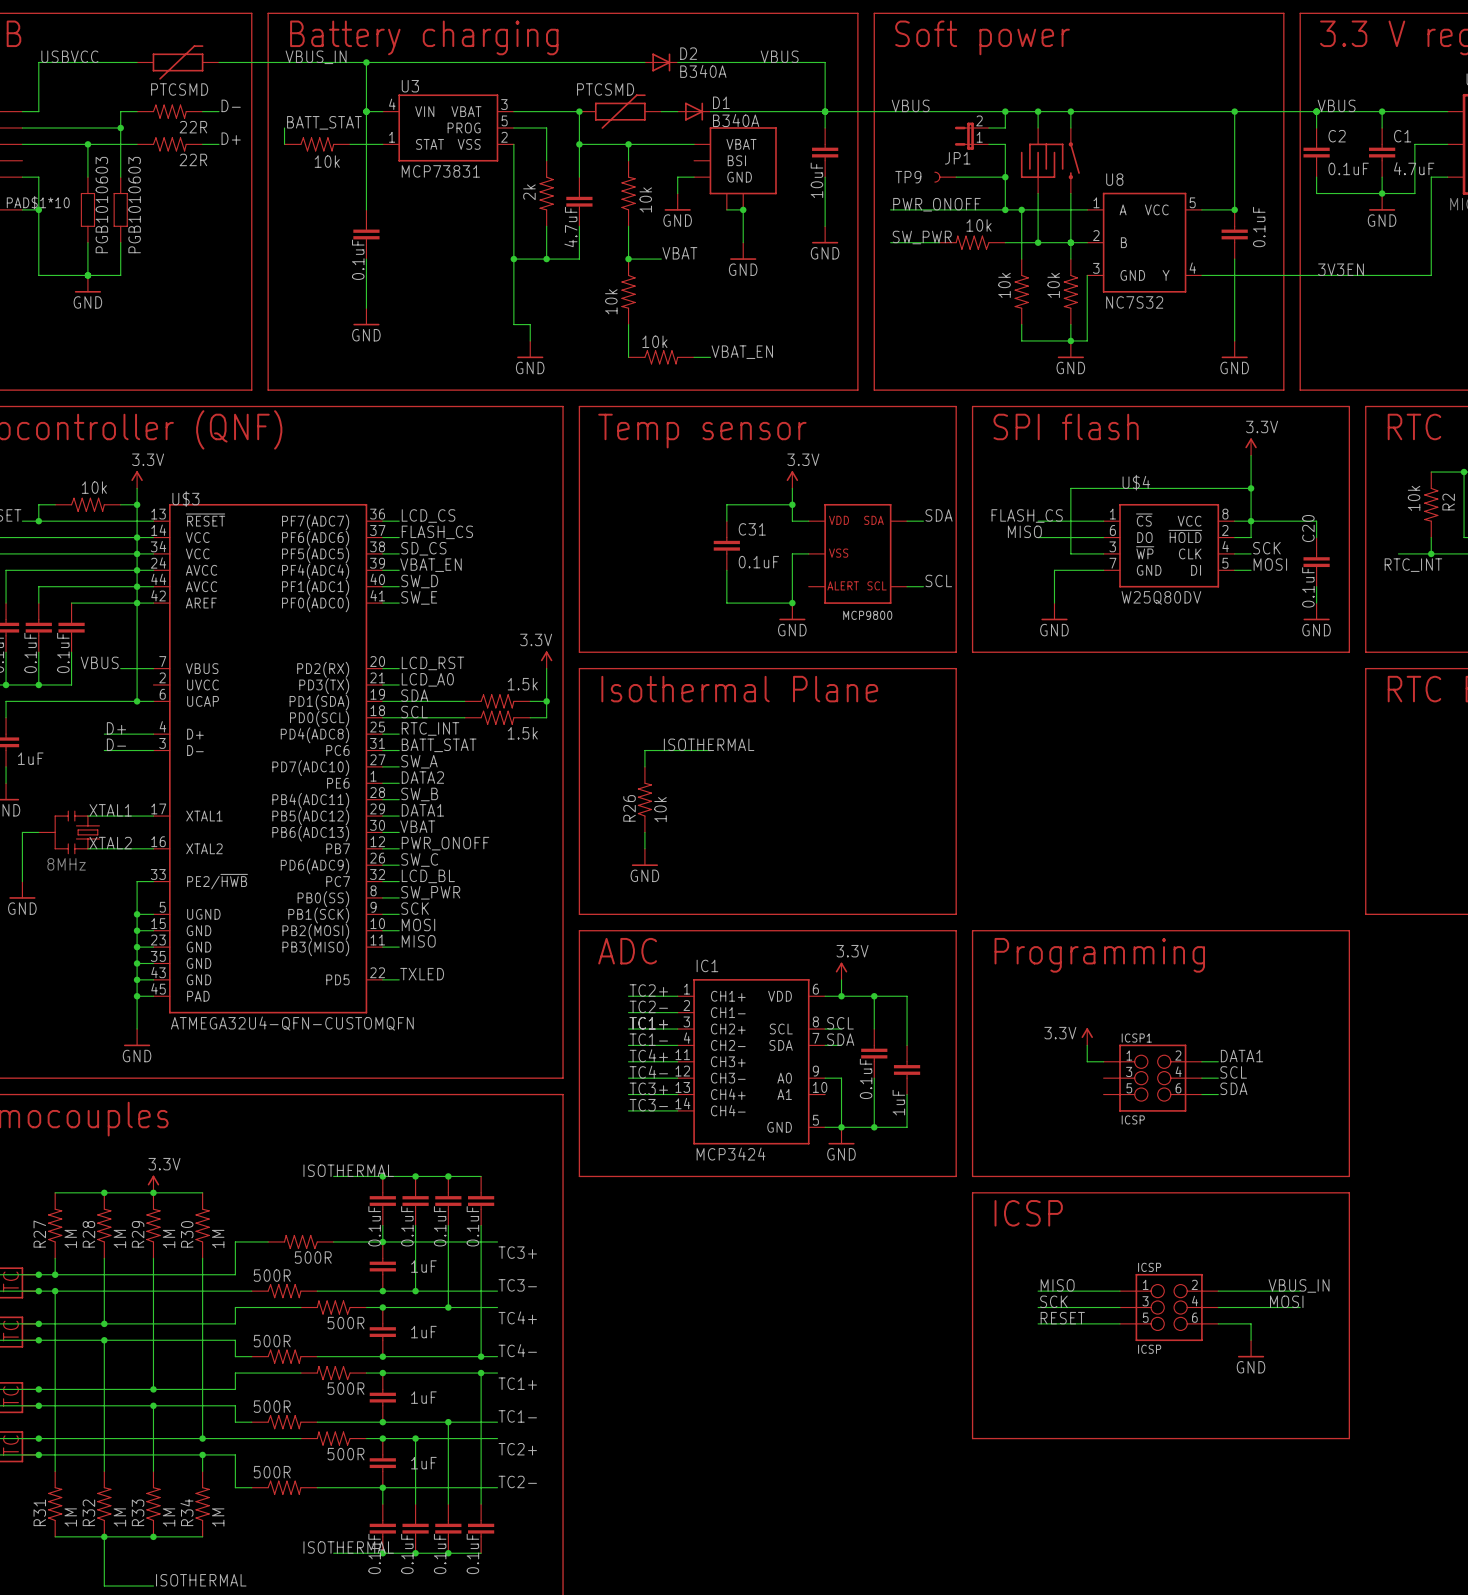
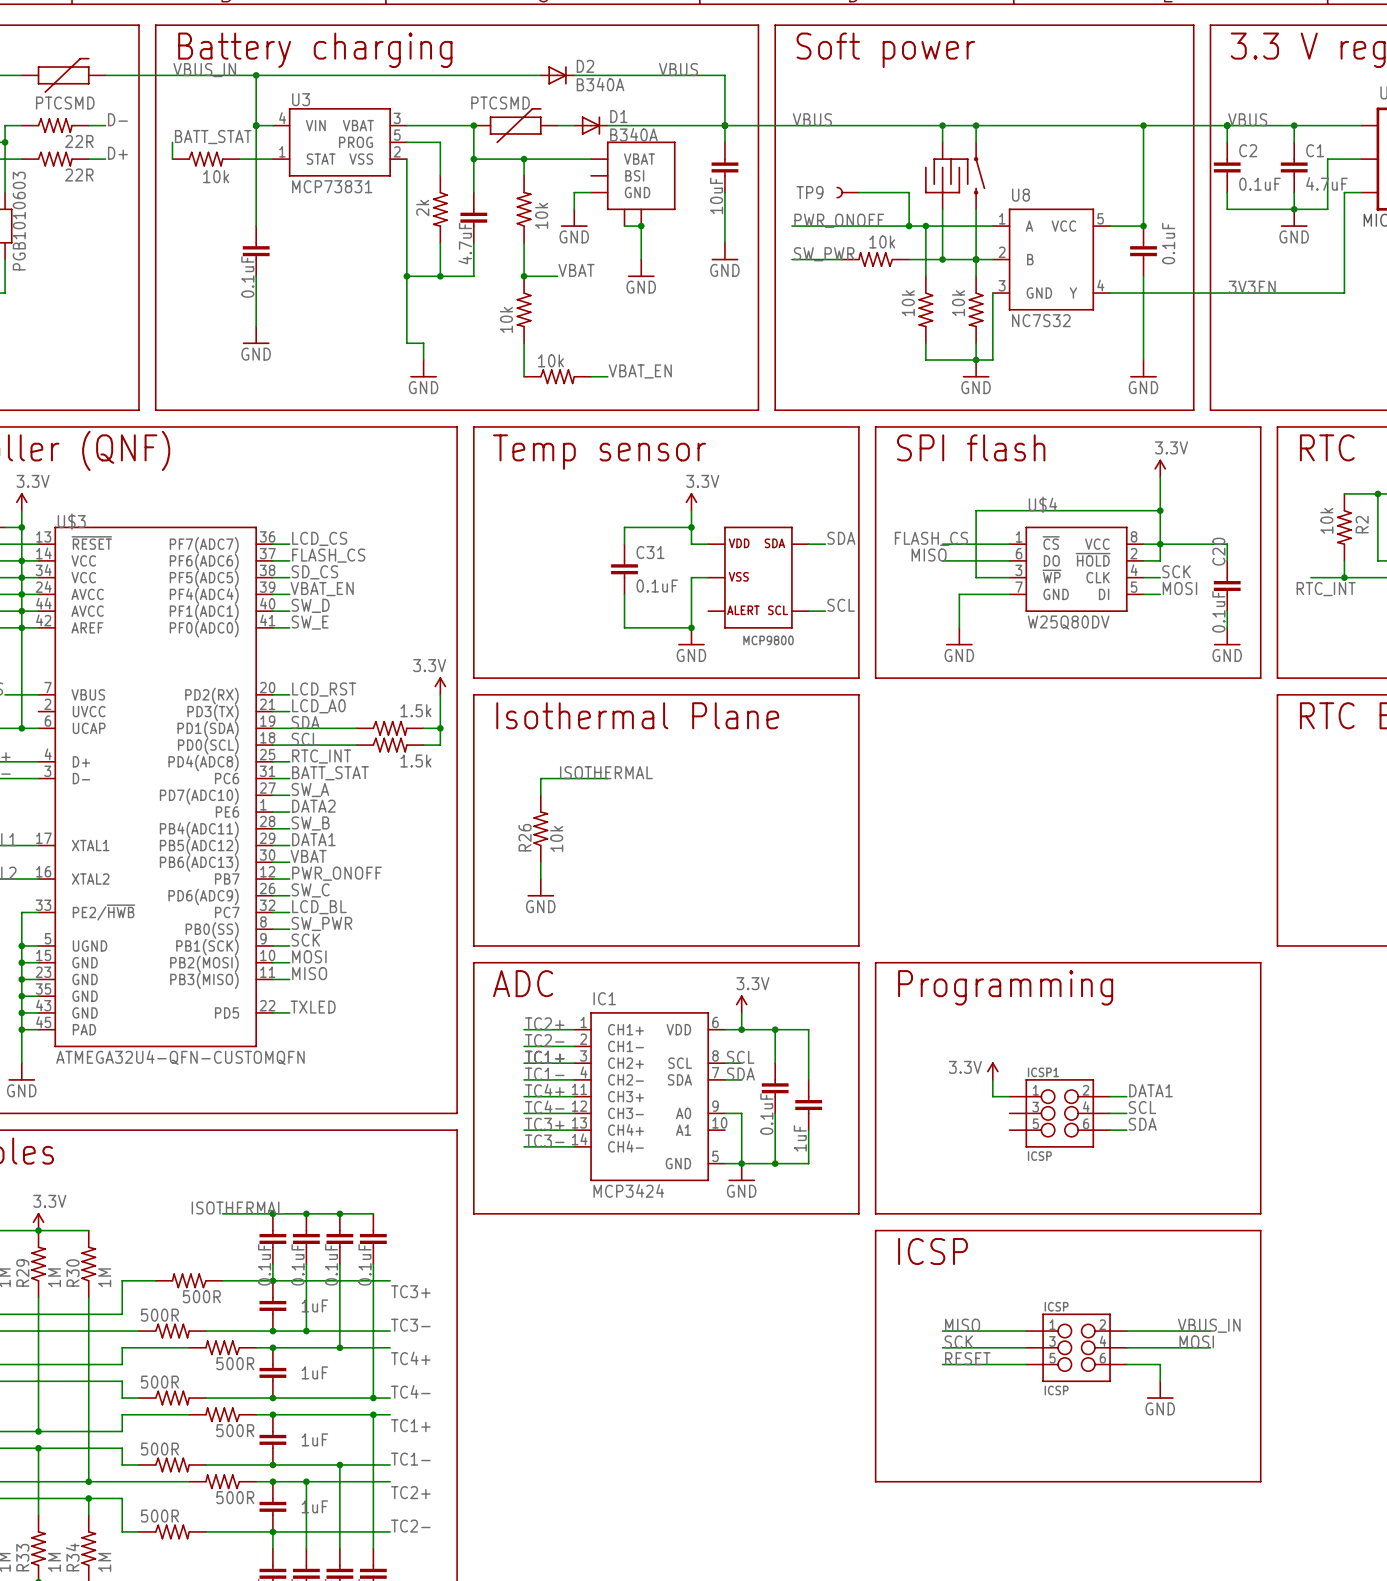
wire: (1005, 111) (1005, 128) (988, 128) -> none
junction: (1005, 111) -> none
JP1: (971, 136) -> none
wire: (988, 144) (1005, 144) (1005, 177) -> none
junction: (1005, 177) -> none

